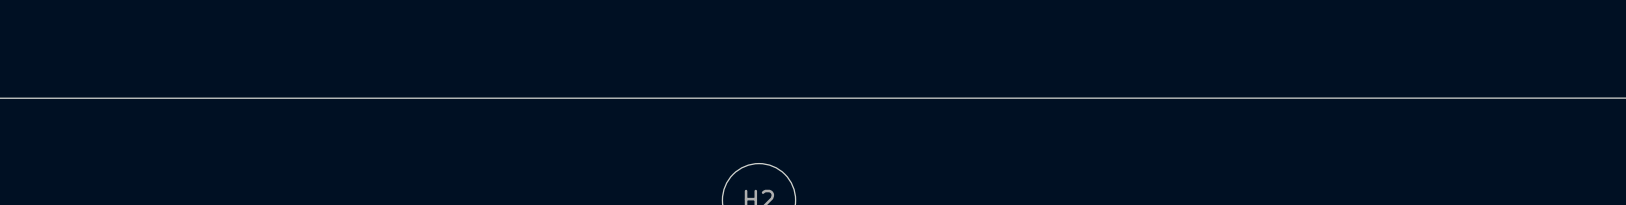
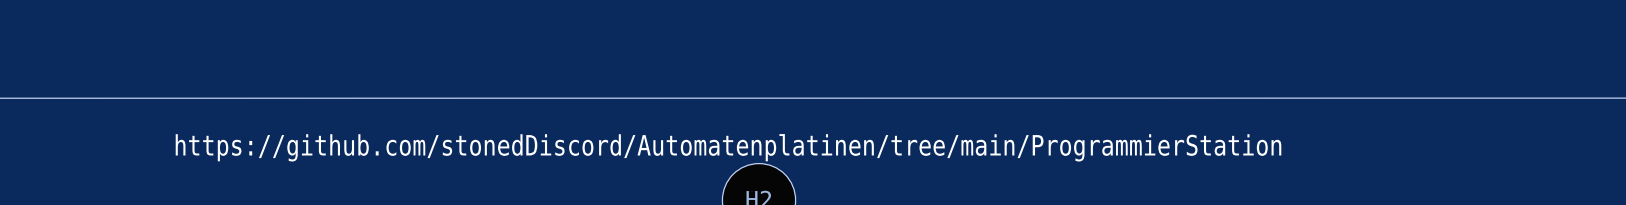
text: none -> https://github.com/stonedDiscord/Automatenplatinen/tree/main/ProgrammierStation (728, 147)

